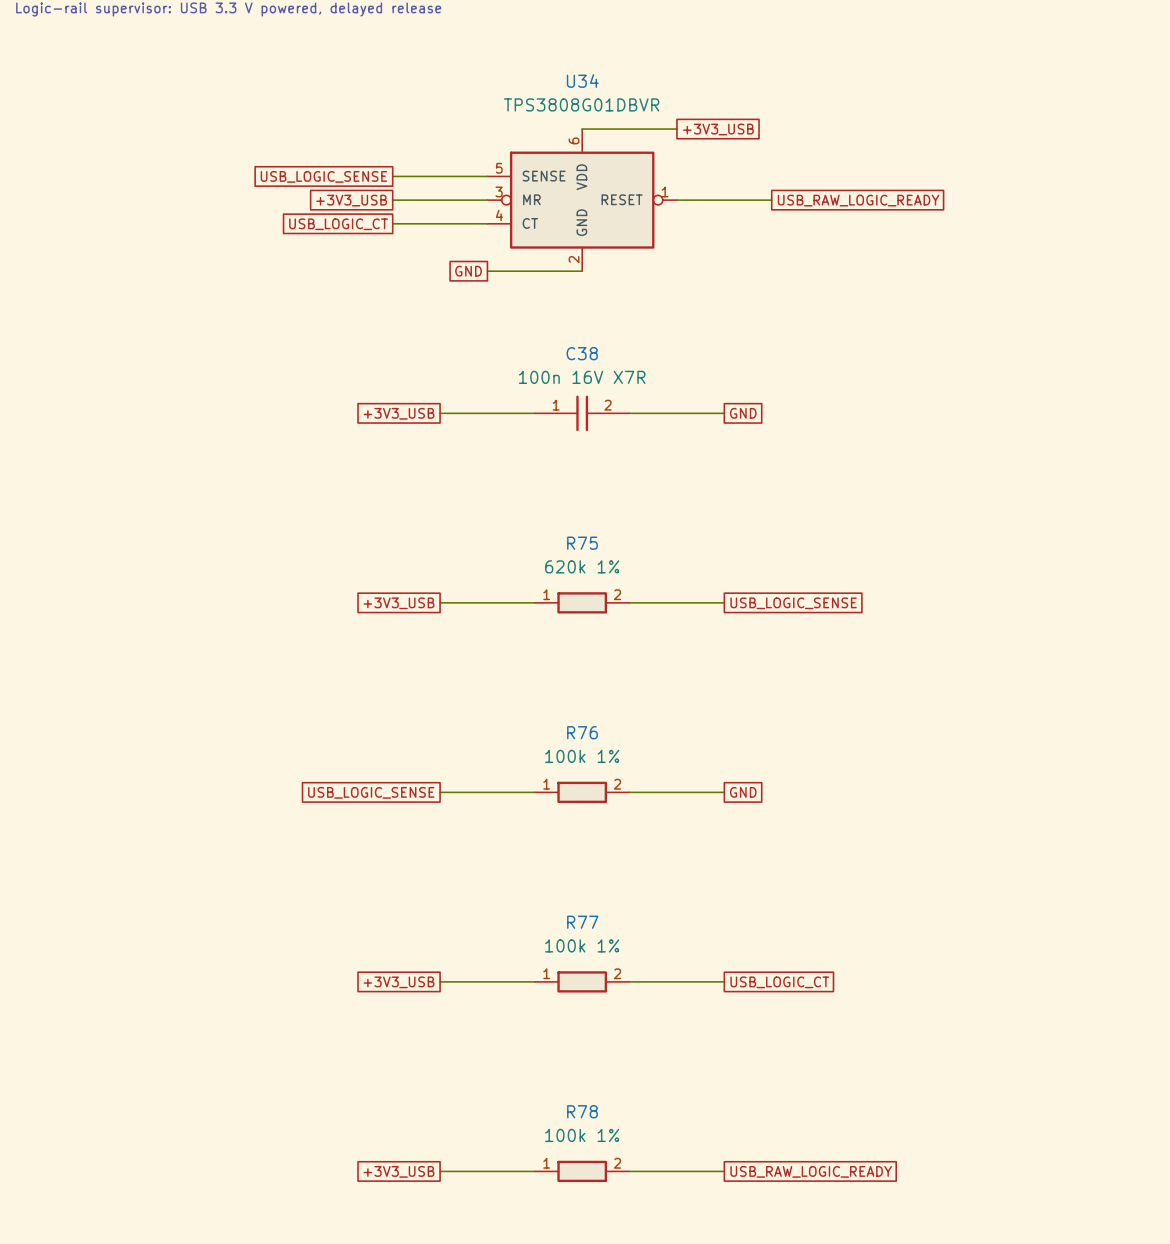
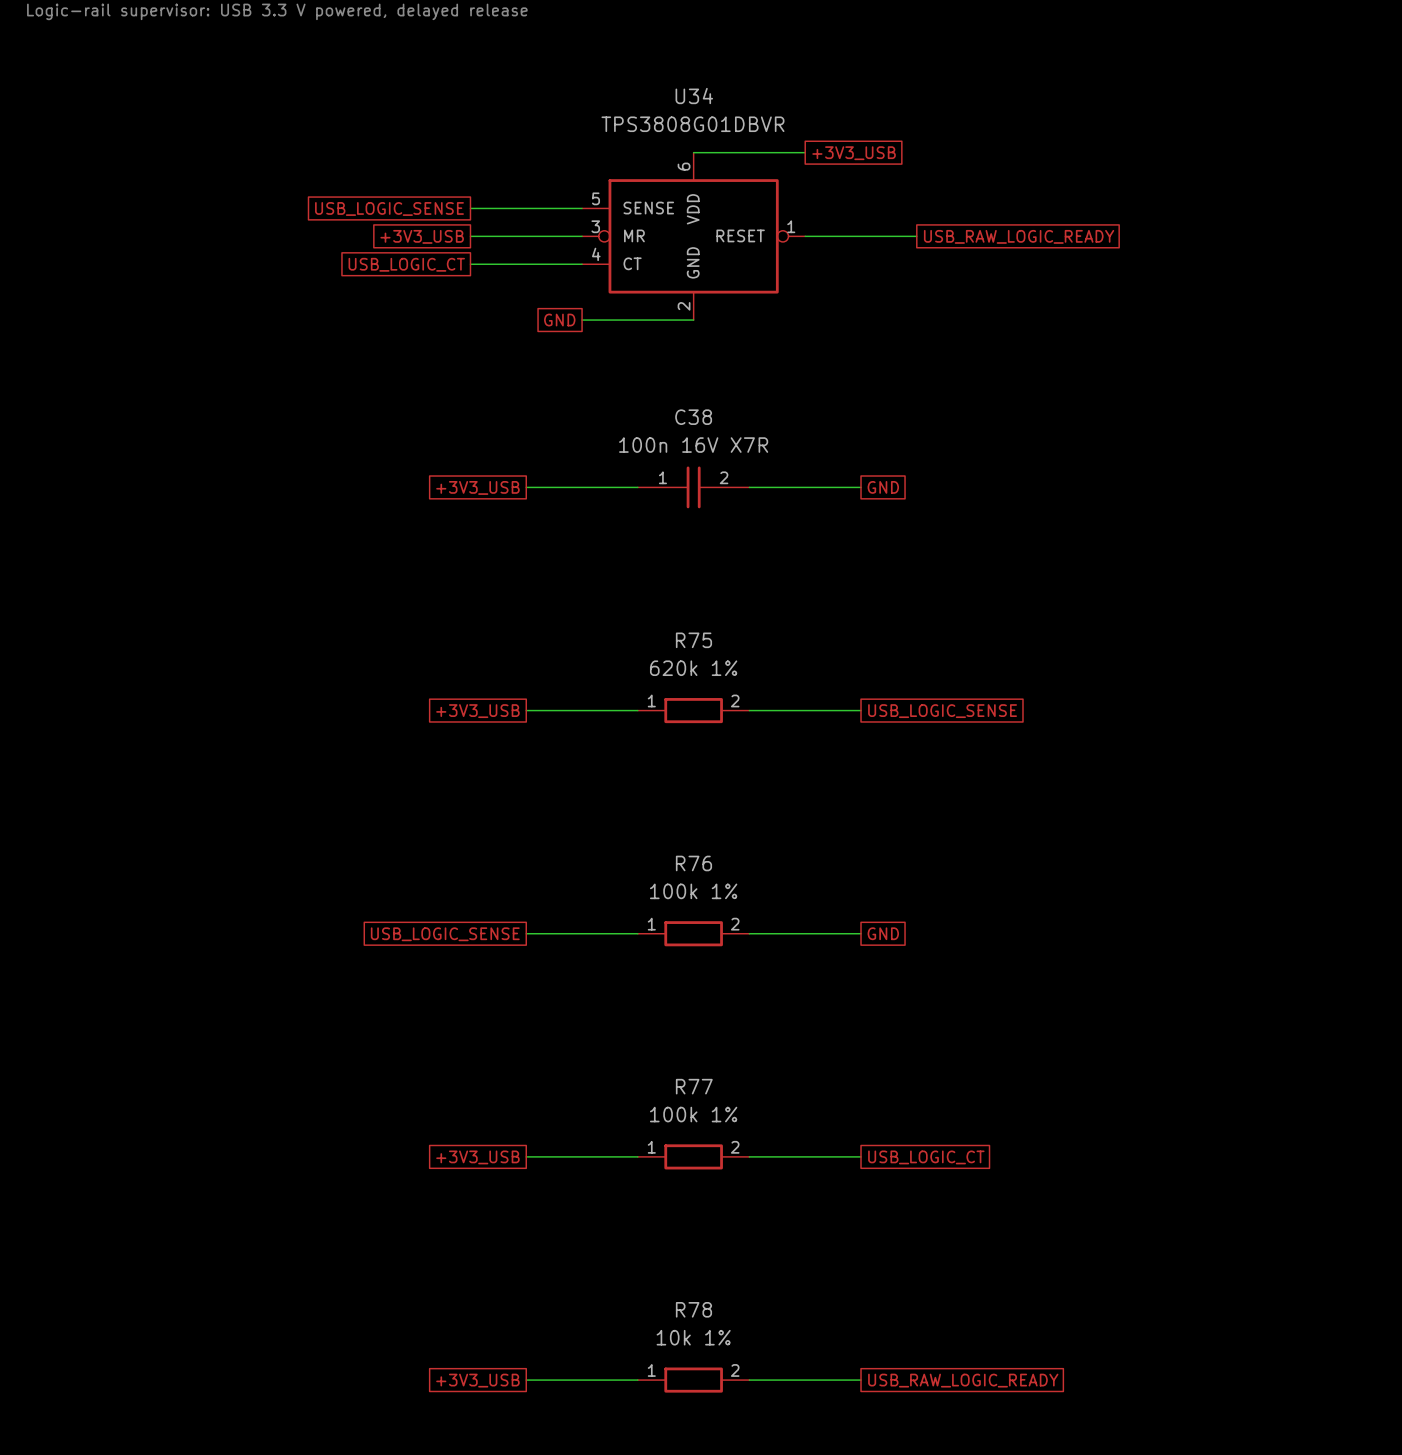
R78 value: 100k 1% (582, 1135) -> 10k 1% (693, 1337)

